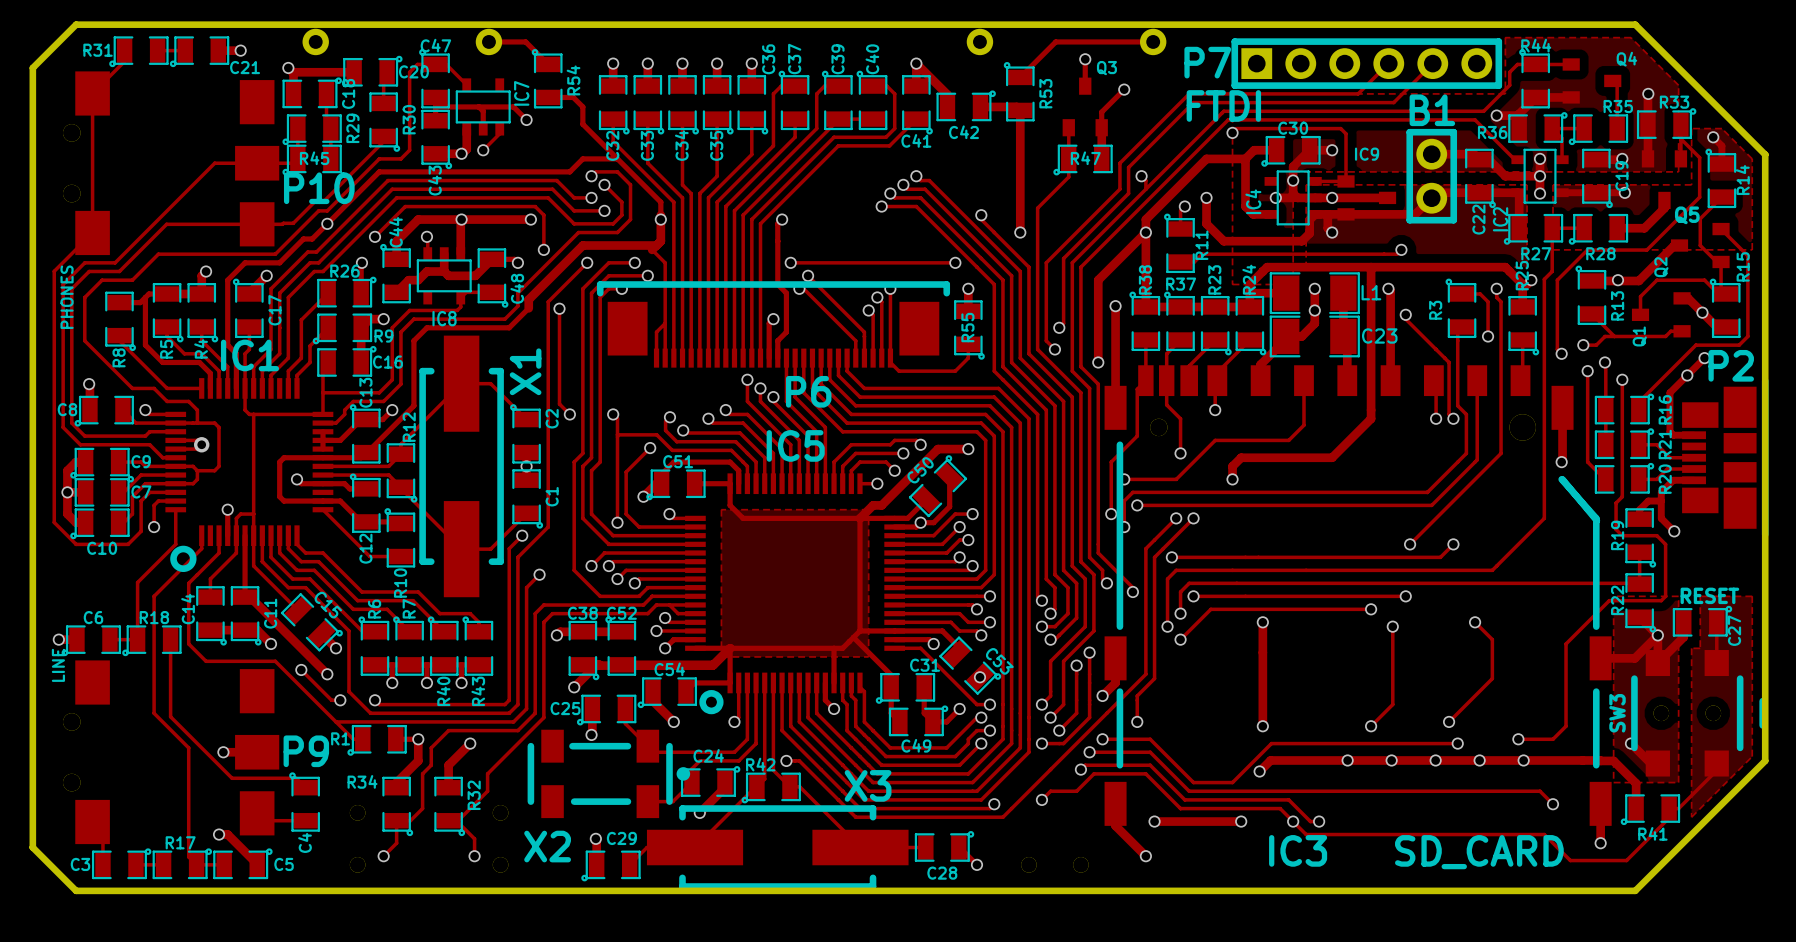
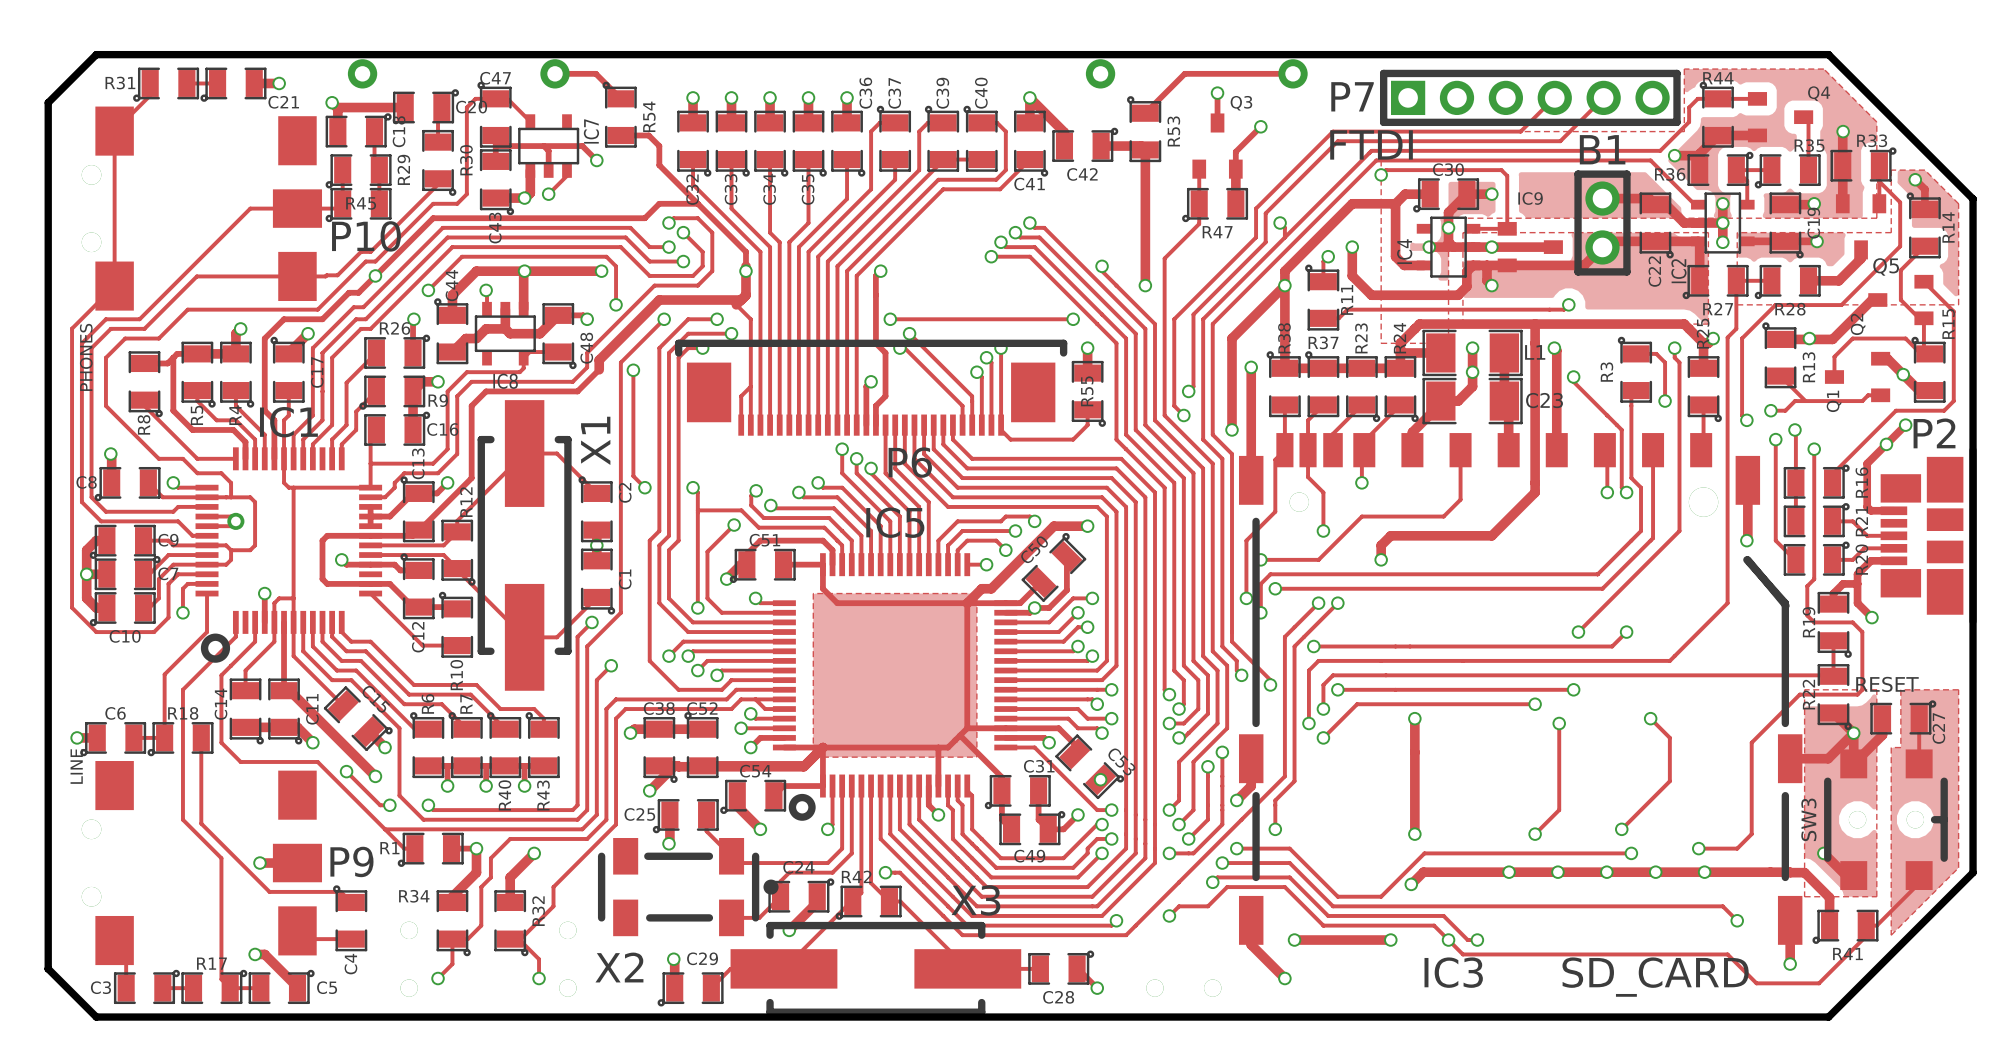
R47 name position: R47 (1085, 158) -> R47 (1217, 232)
SW3 footprint: [1631, 650, 1766, 777] -> [1824, 749, 1948, 890]

